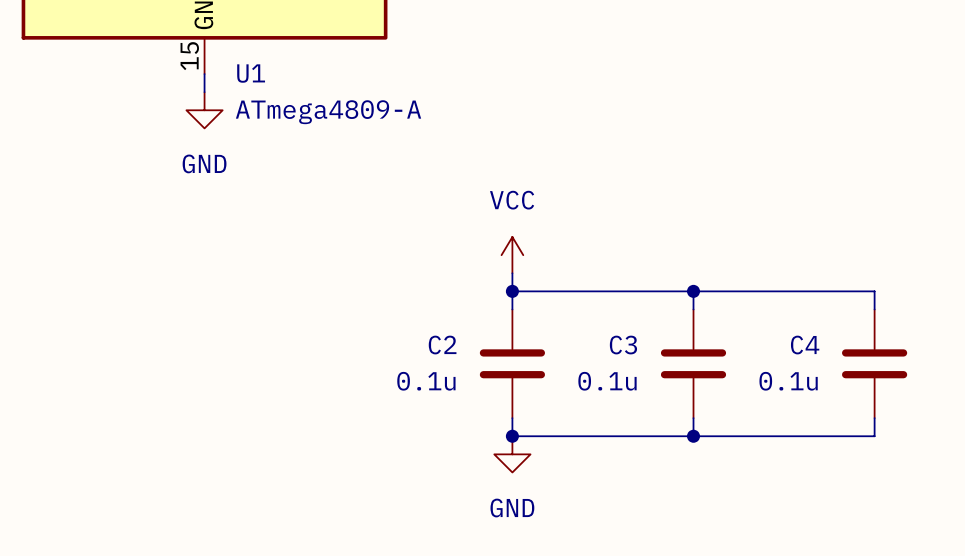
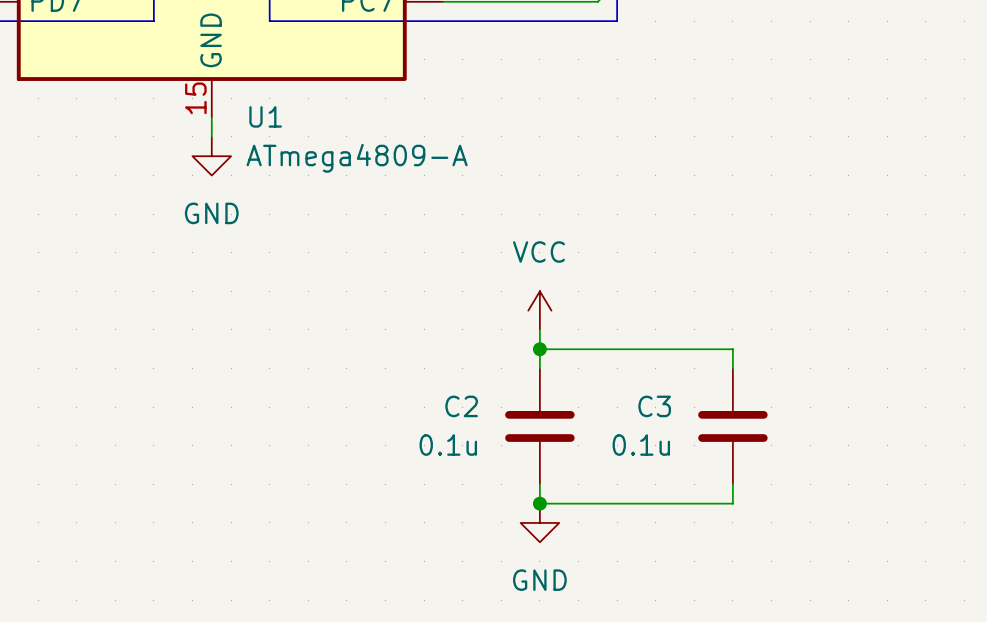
wire: (693, 291) (874, 291) (874, 309) -> none
junction: (693, 291) -> none
C4: 0.1u (874, 363) -> none
wire: (874, 418) (874, 436) (693, 436) -> none
junction: (693, 436) -> none

